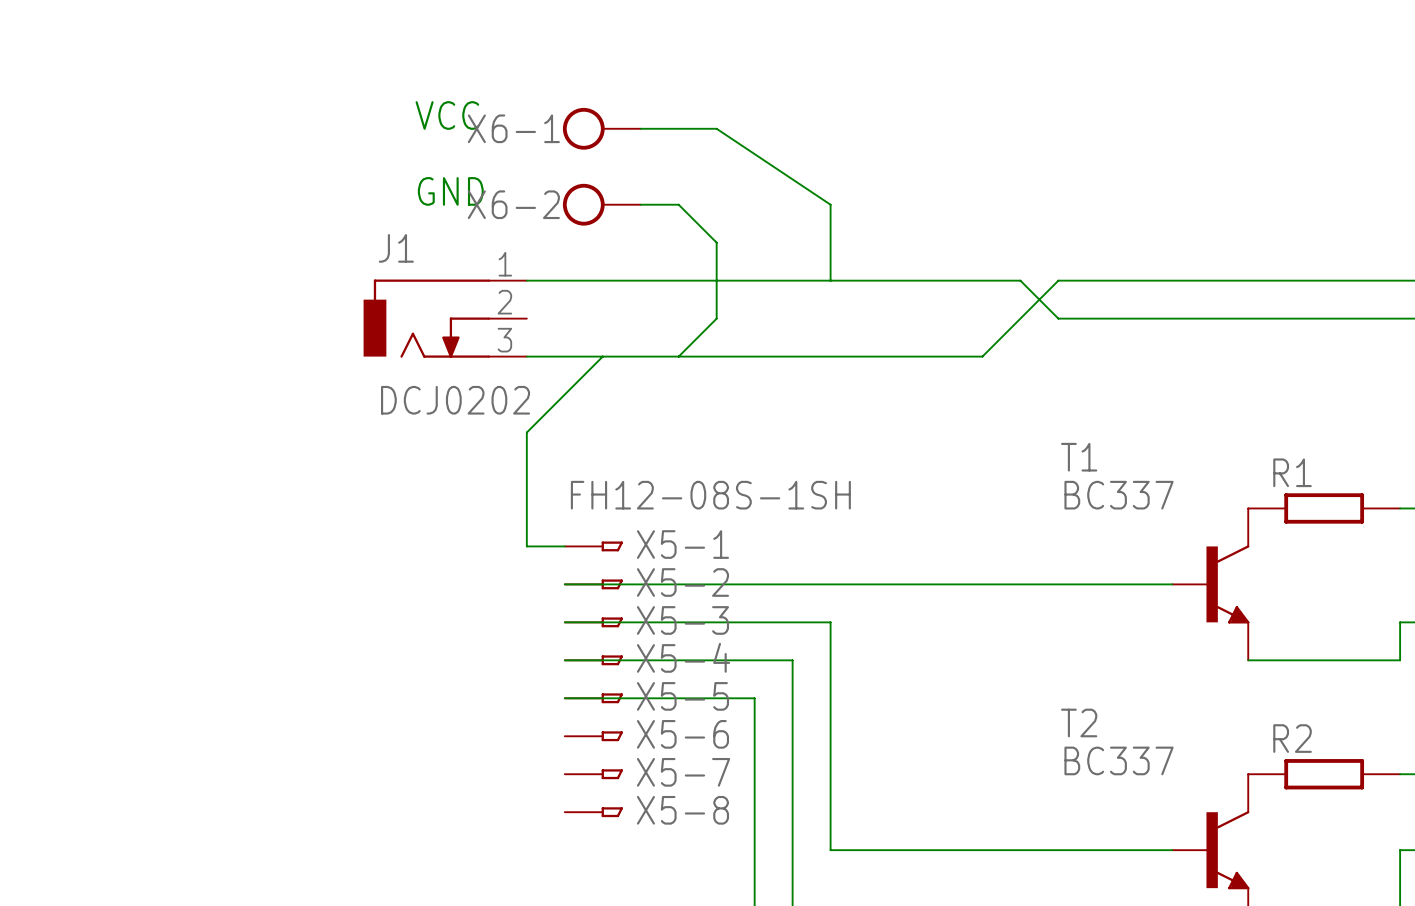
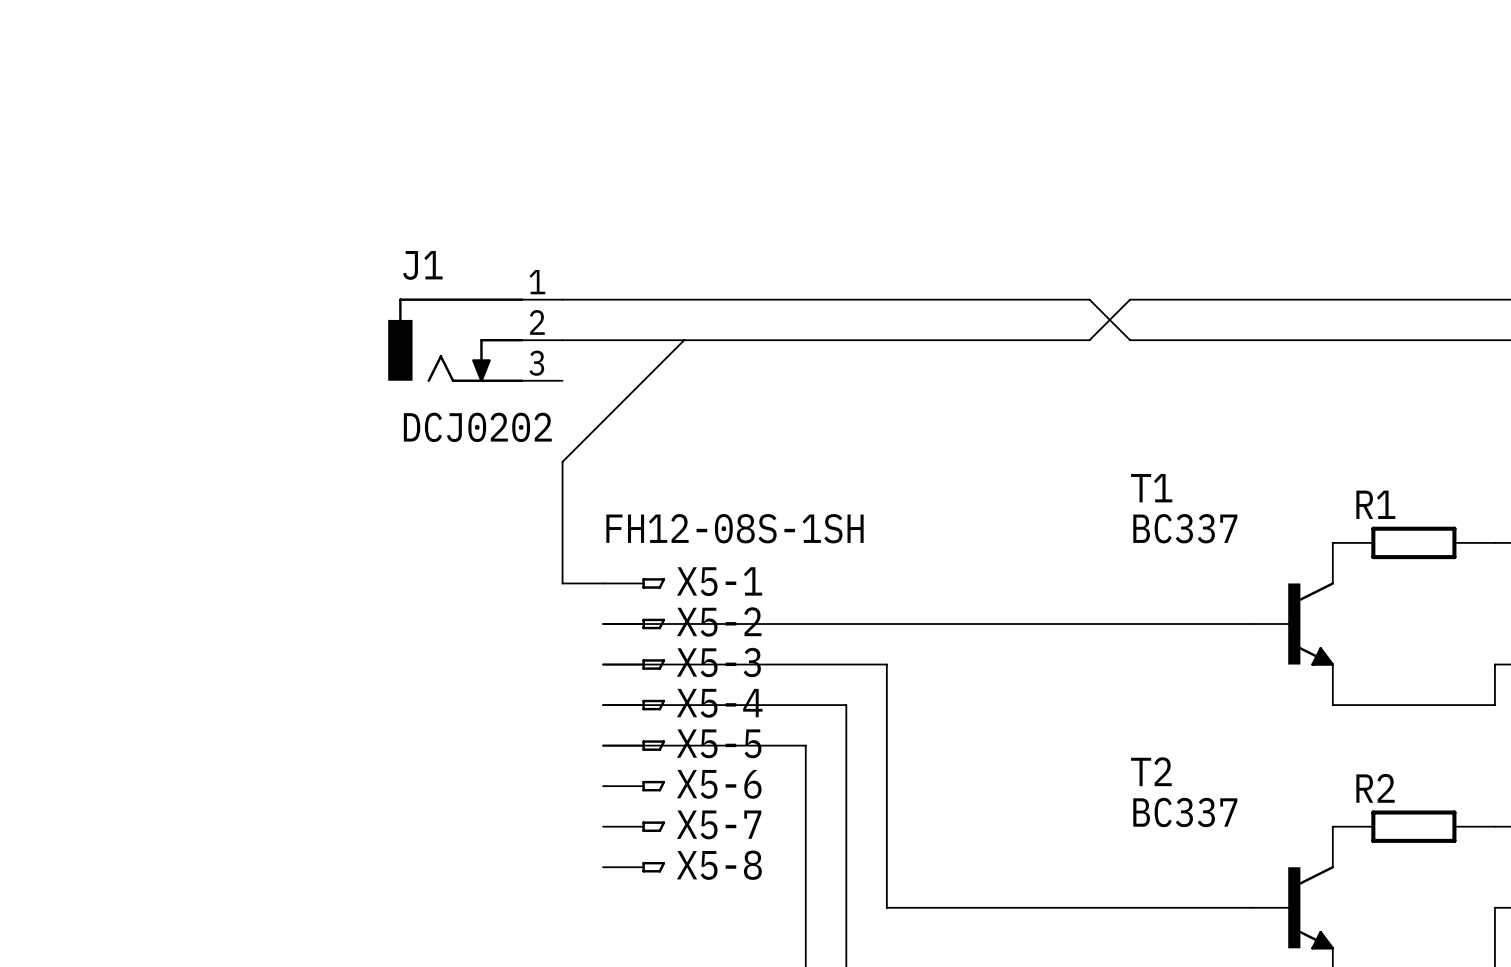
text: VCC (447, 115) -> none
X6-1: (601, 128) -> none
wire: (640, 128) (716, 128) (830, 204) (830, 280) -> none
text: GND (450, 191) -> none
X6-2: (601, 204) -> none
wire: (640, 204) (678, 204) (716, 242) (716, 318) (678, 356) -> none
wire: none -> (684, 340) (643, 380)
wire: (1020, 318) (982, 356) (526, 356) -> (1089, 340) (562, 340)

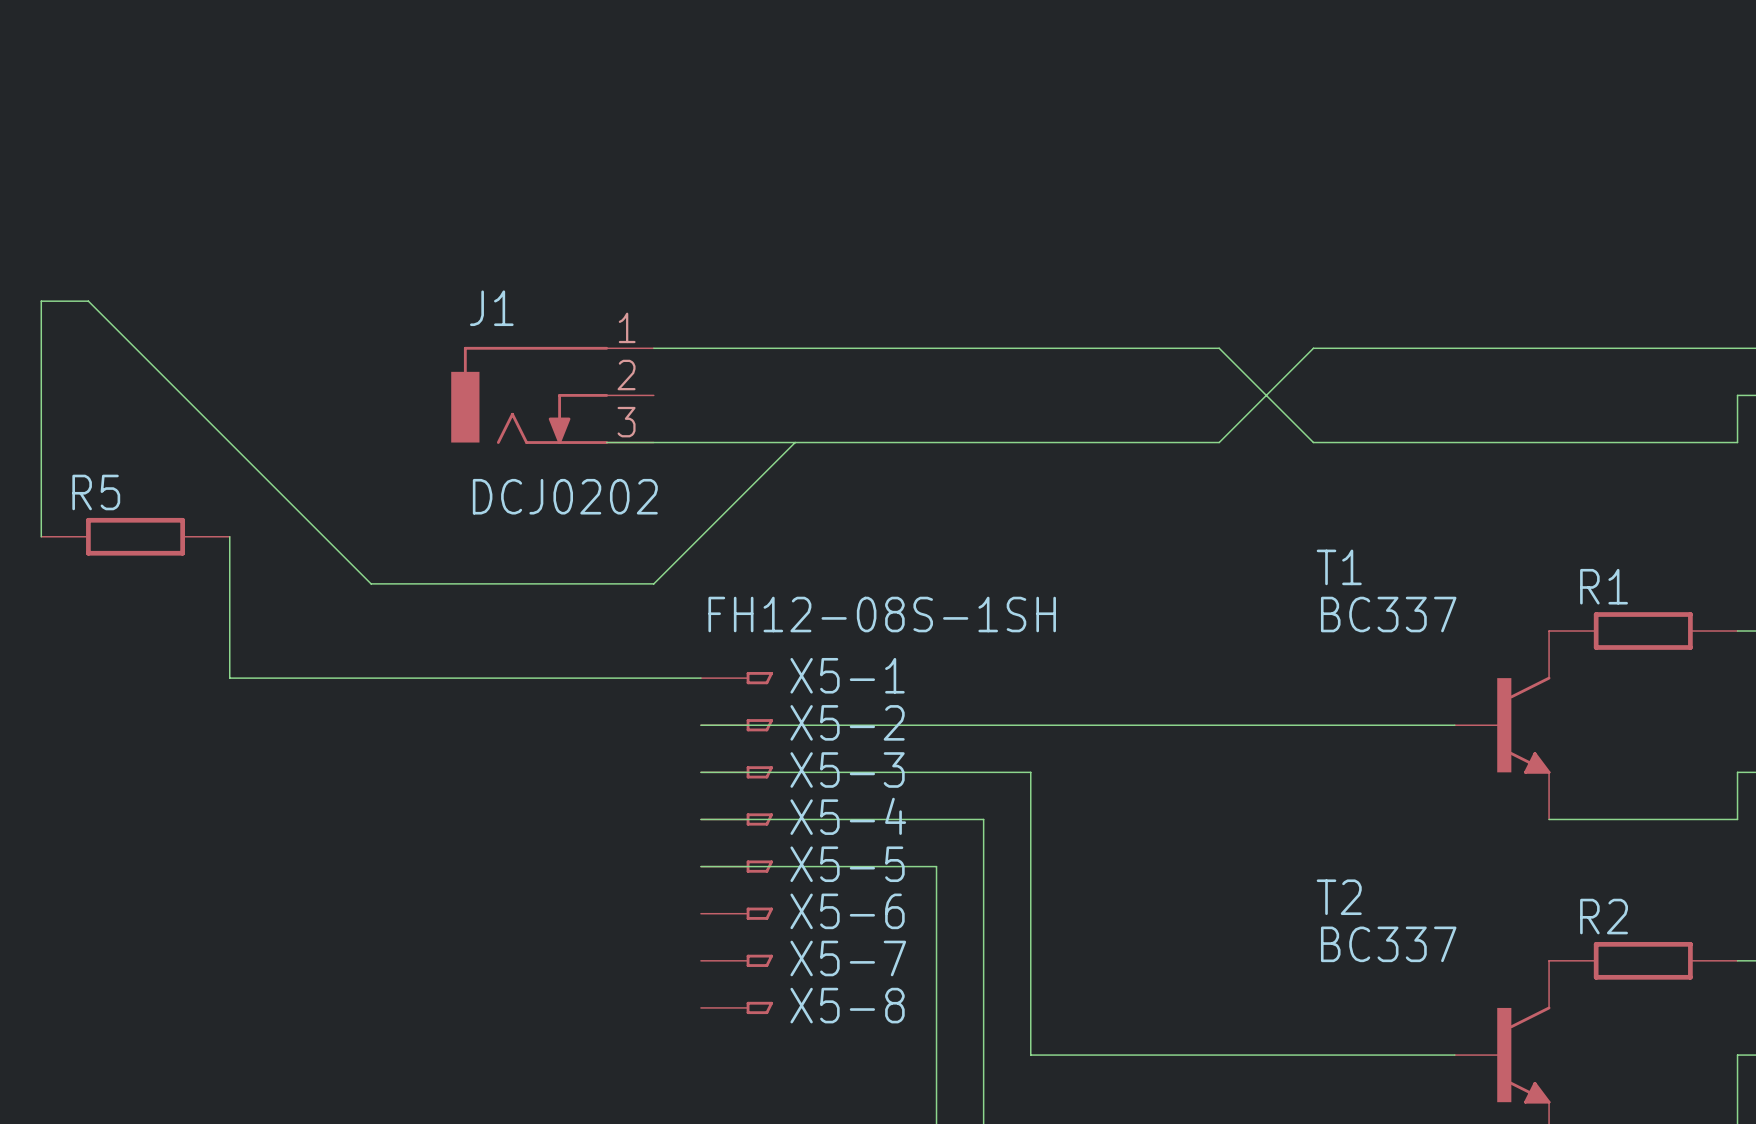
wire: (1049, 299) (1089, 299) (1130, 340) (1494, 340) -> (1219, 348) (1313, 442) (1737, 442) (1737, 395)
wire: (562, 340) (1089, 340) -> (606, 442) (1219, 442) (1266, 395)
wire: (684, 340) (562, 461) (562, 583) -> (229, 536) (229, 678) (653, 678)
wire: none -> (795, 442) (653, 583) (371, 583) (88, 301) (41, 301) (41, 536)
R5: none -> (135, 536)

